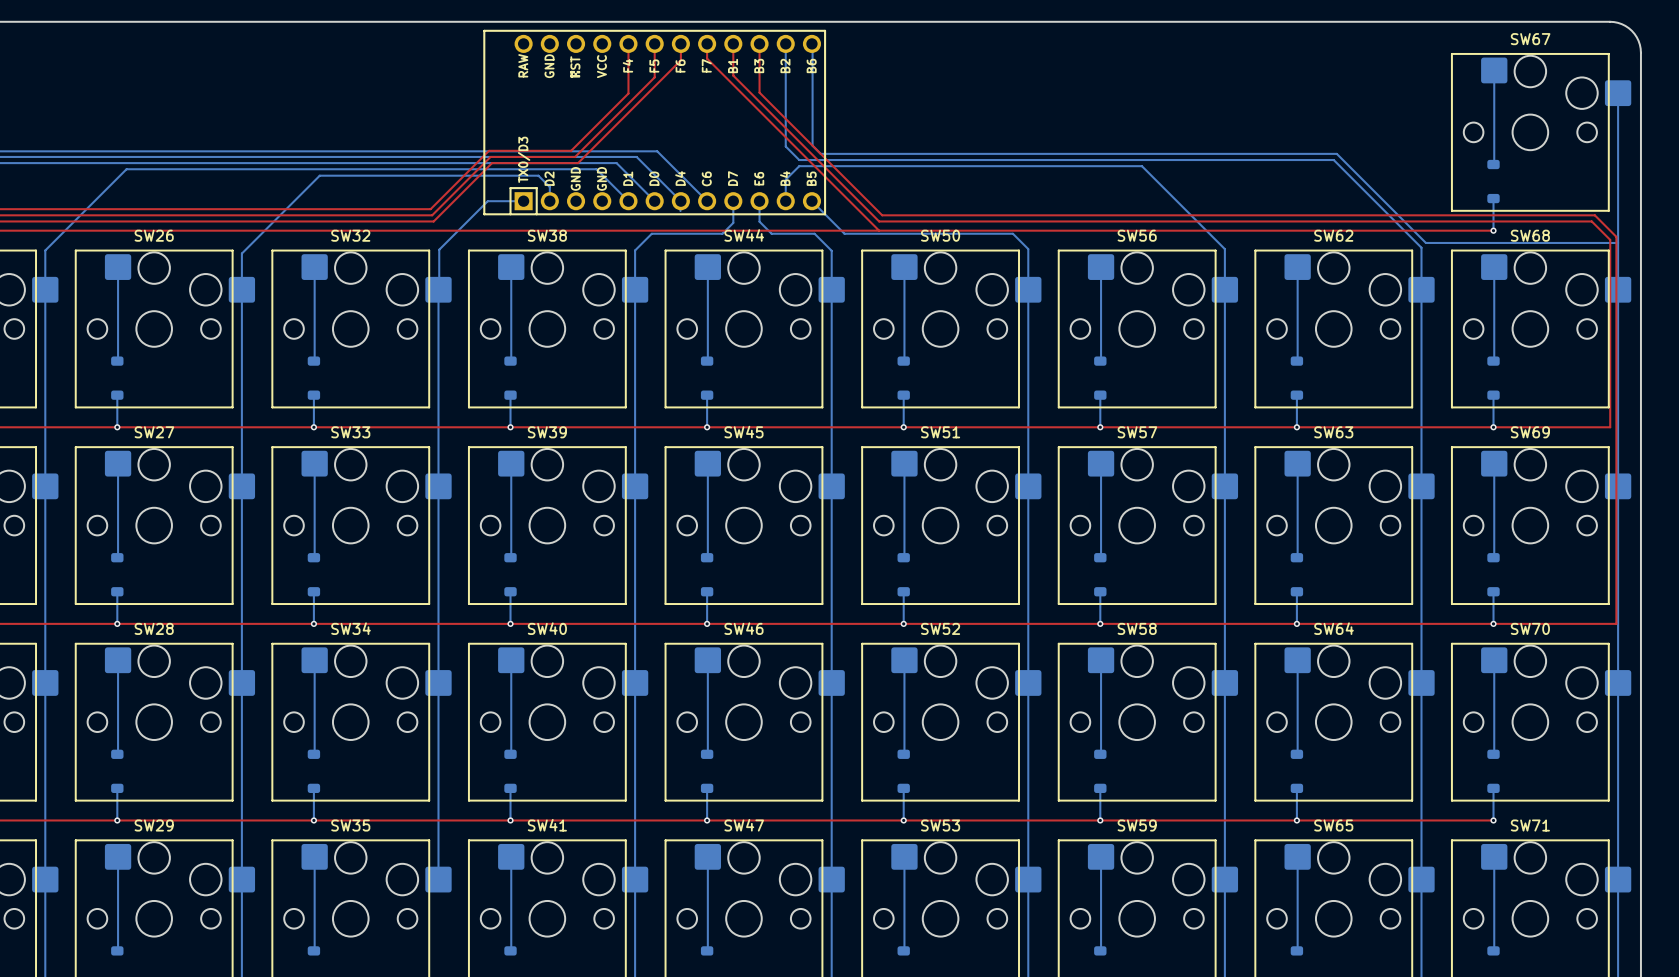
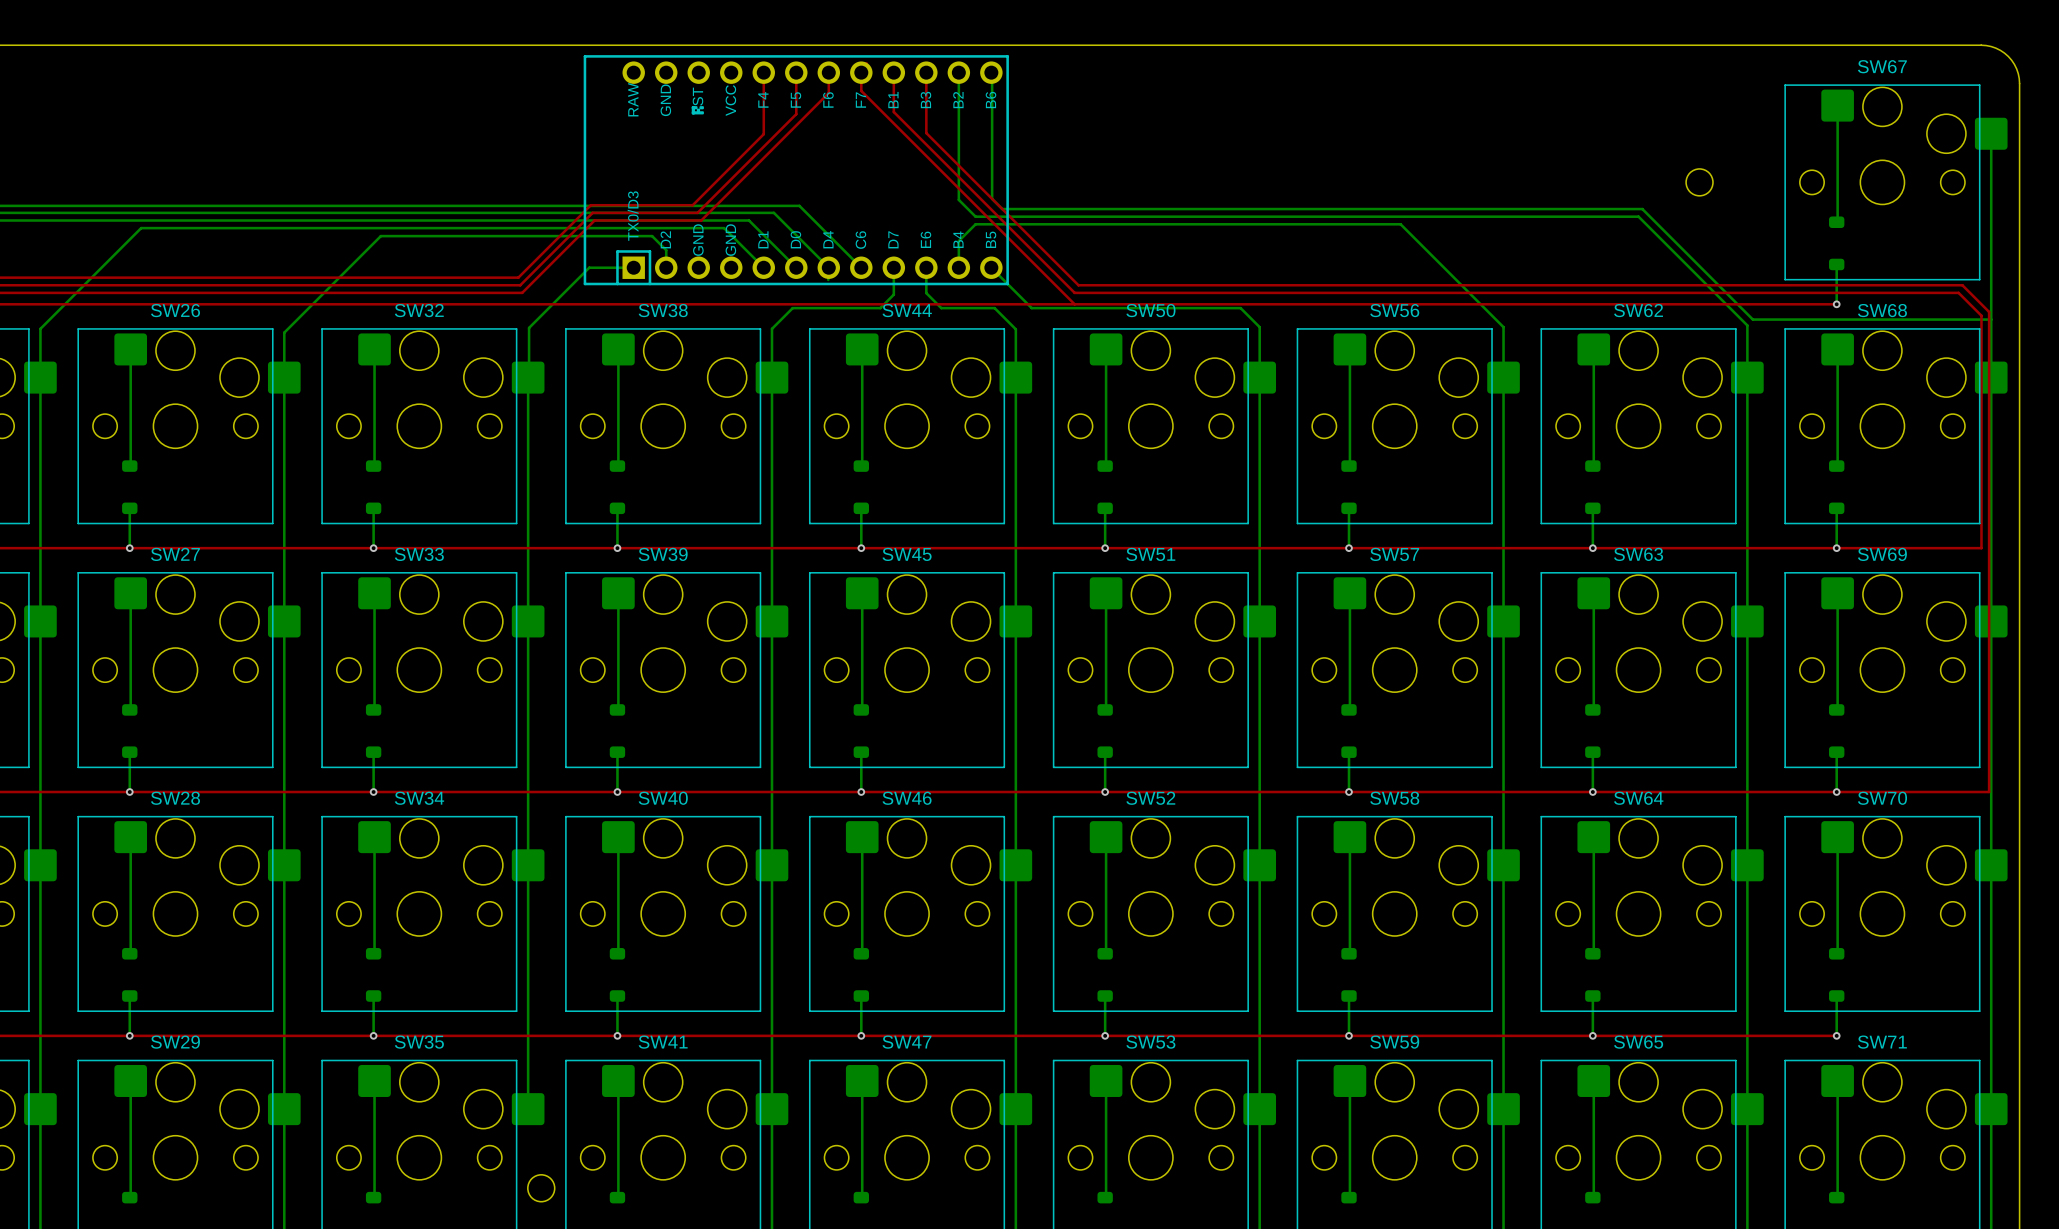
round board edge: none -> [1685, 168, 1714, 197]
round board edge: none -> [527, 1174, 556, 1203]

